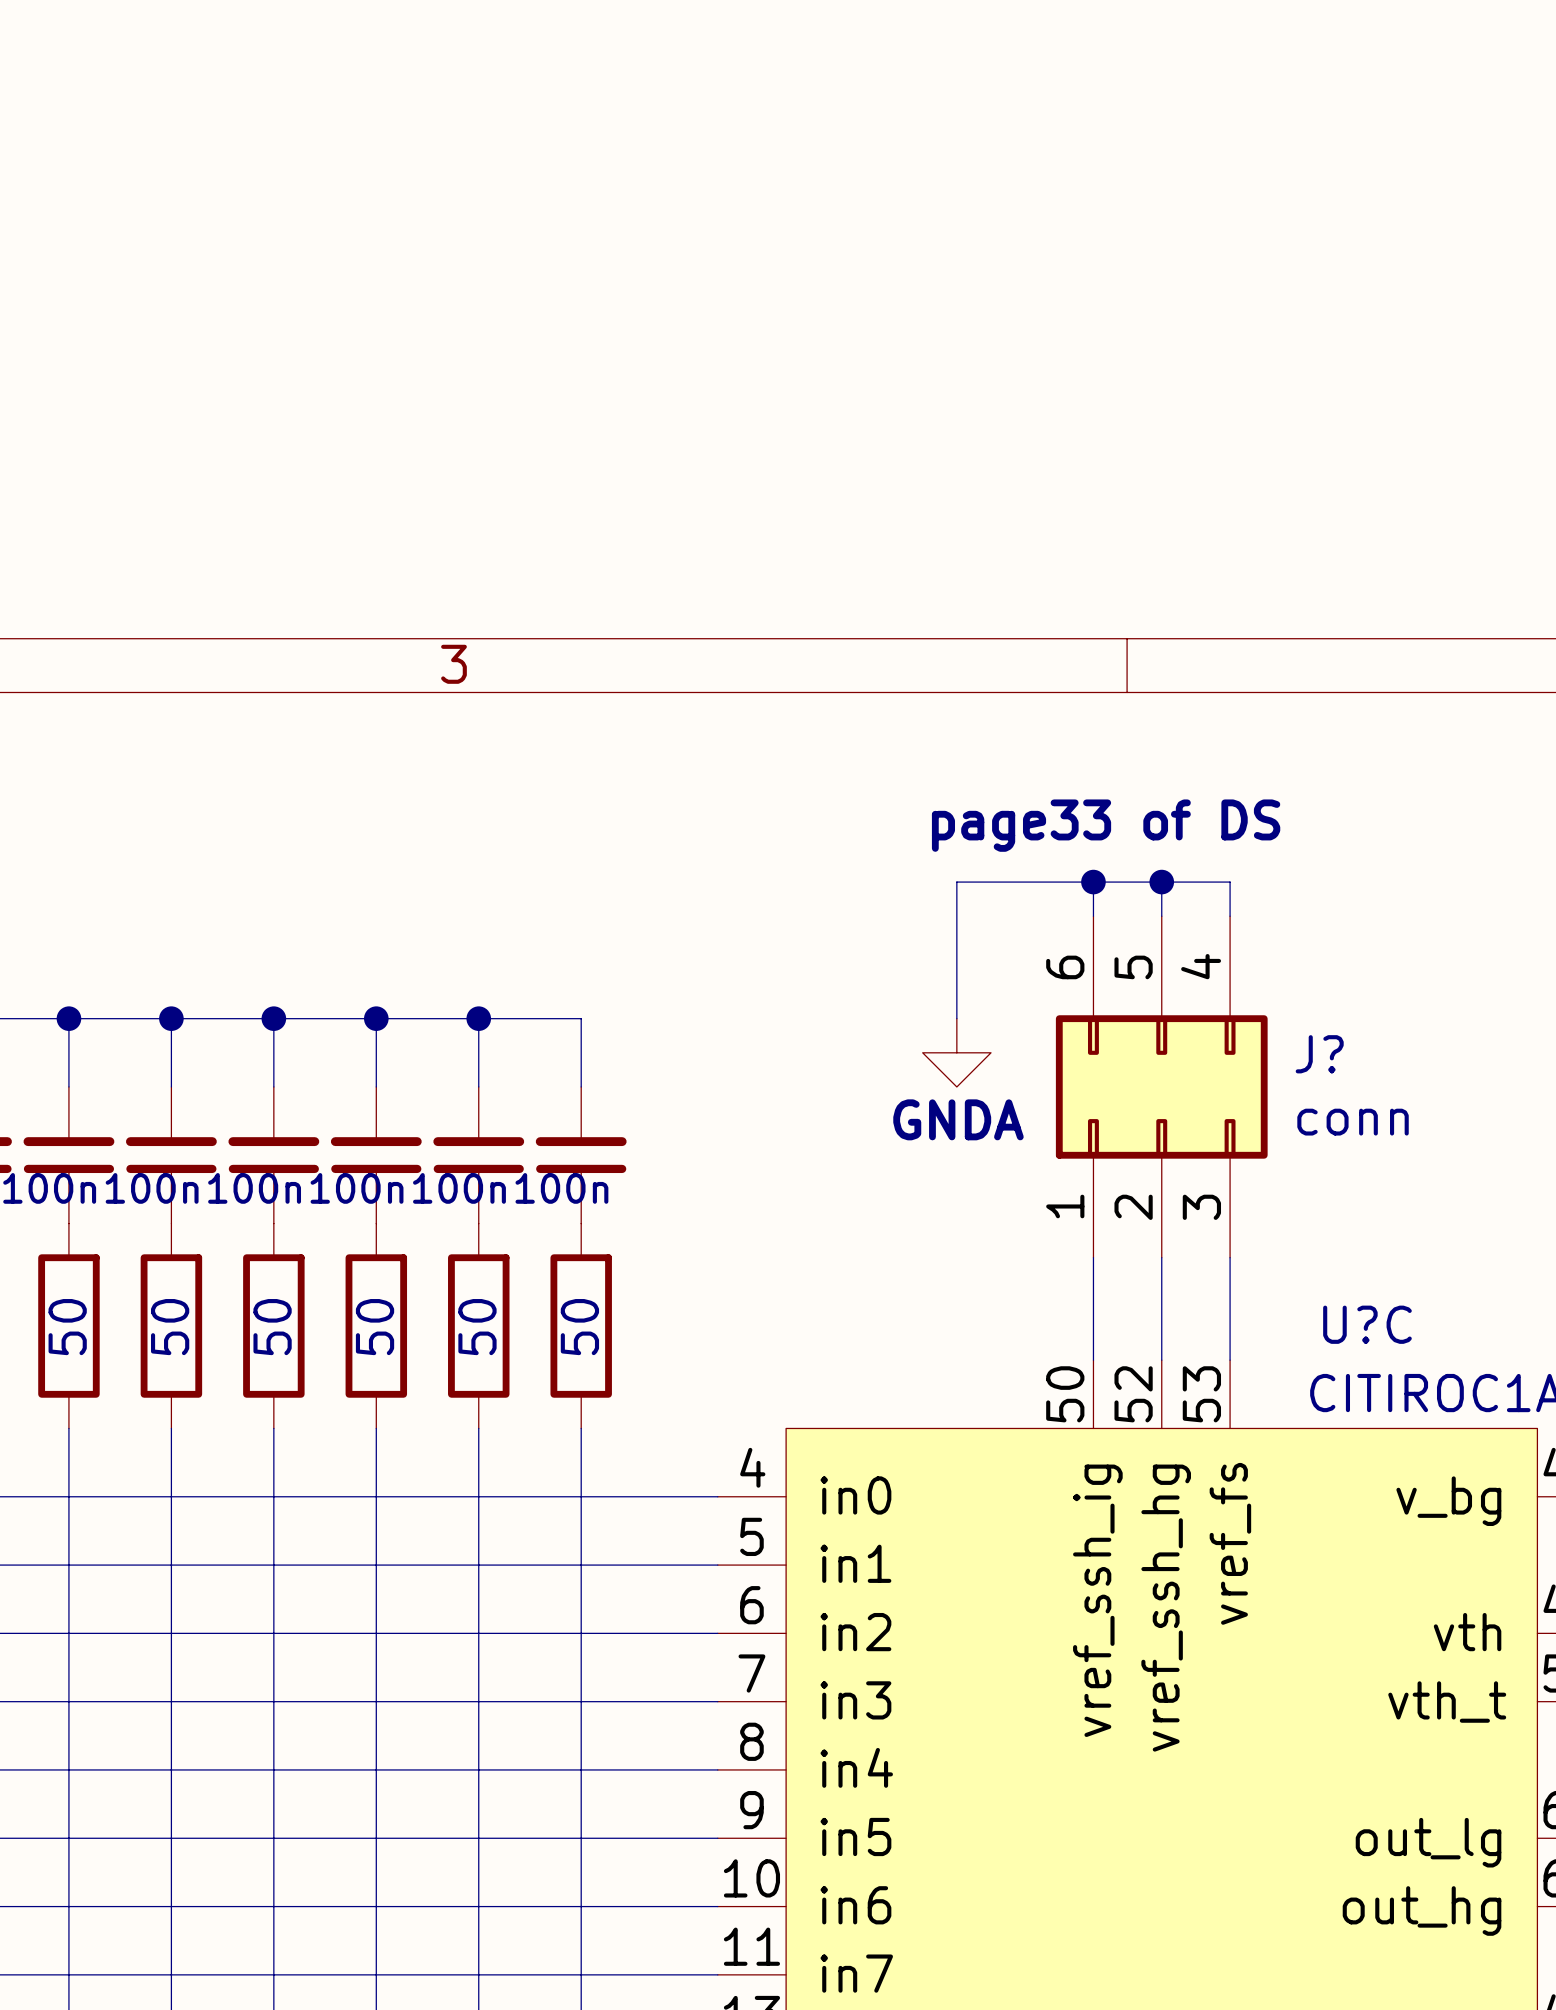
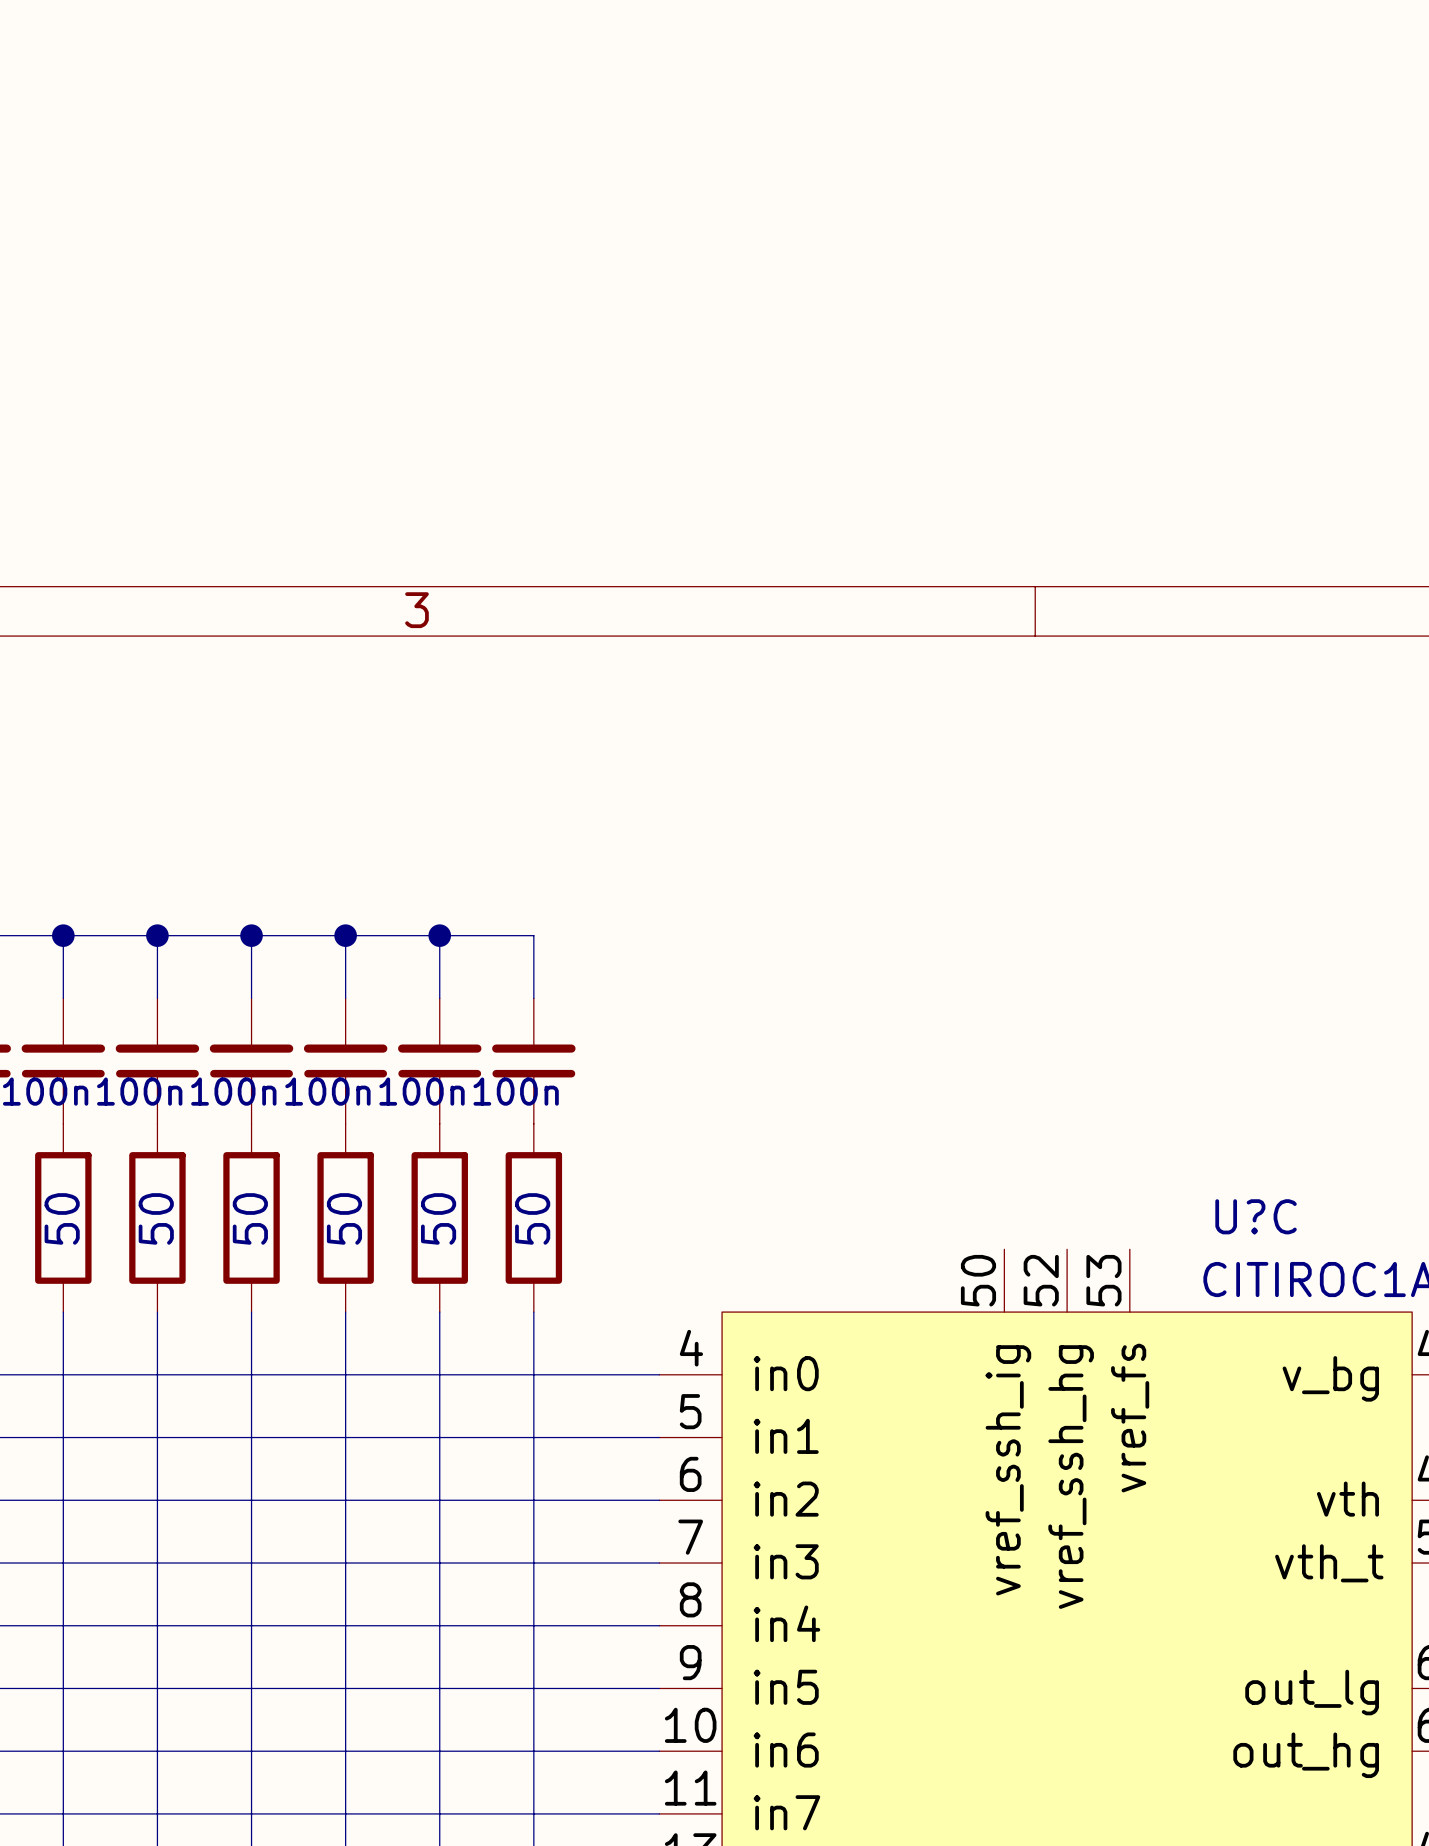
text: page33 of DS (1106, 825) -> none
wire: (1093, 882) (1093, 916) -> none
junction: (1093, 882) -> none
wire: (1161, 882) (1161, 916) -> none
junction: (1161, 882) -> none
wire: (1230, 916) (1230, 882) (956, 882) (956, 1018) -> none
power symbol: GNDA (956, 1052) -> none
J?: conn (1161, 1086) -> none
wire: (1093, 1257) (1093, 1360) -> none
wire: (1161, 1257) (1161, 1360) -> none
wire: (1230, 1257) (1230, 1360) -> none

